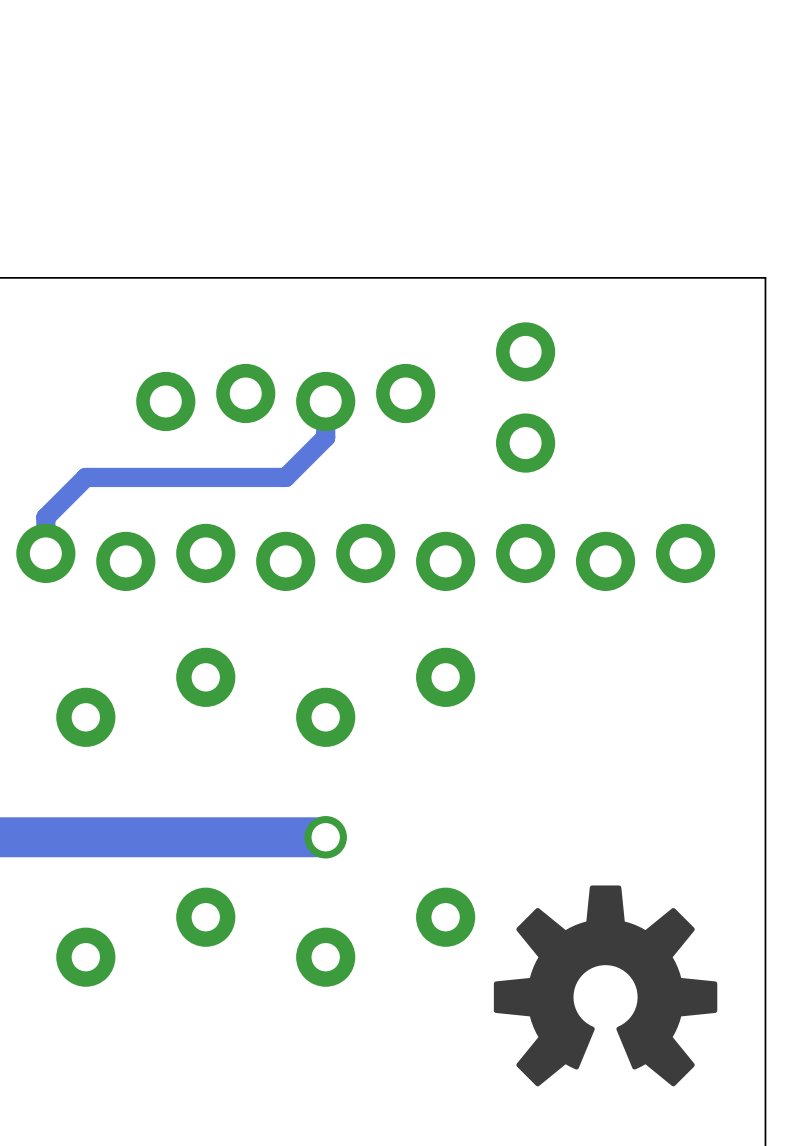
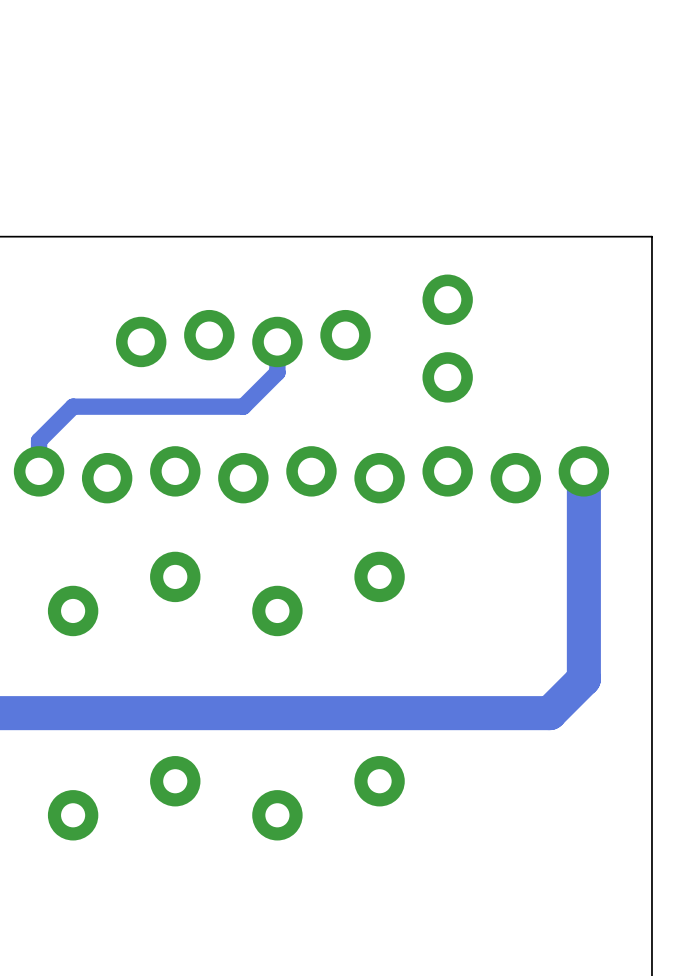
track: none -> (583, 471) (583, 679) (549, 713) (277, 713)
via: (325, 837) -> none
drawing: [493, 885, 718, 1087] -> none

